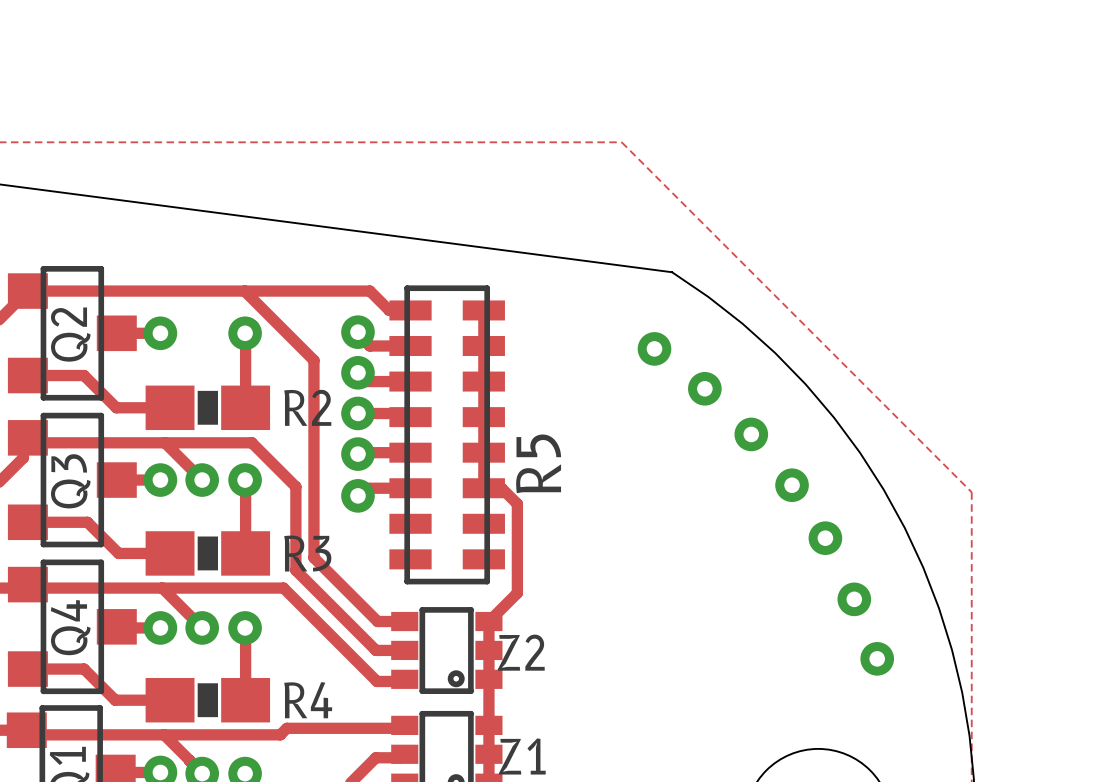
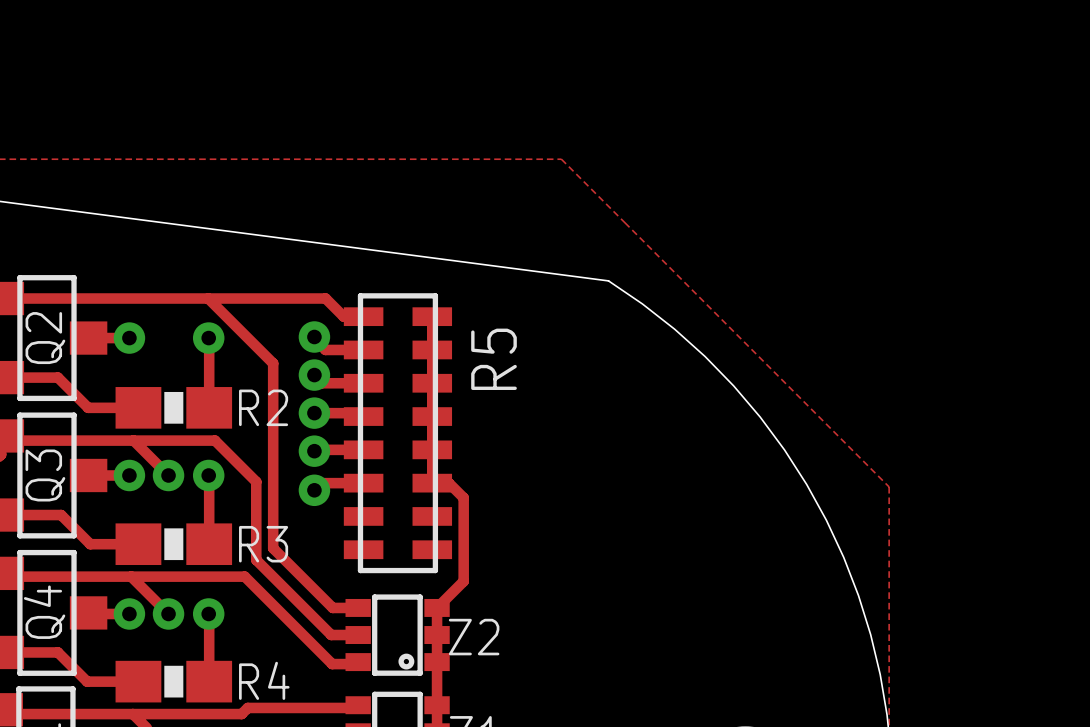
via: (654, 348) -> none
via: (704, 388) -> none
via: (751, 434) -> none
R5 name position: R5 (538, 463) -> R5 (494, 359)
via: (792, 485) -> none
via: (825, 538) -> none
via: (854, 599) -> none
via: (877, 658) -> none

